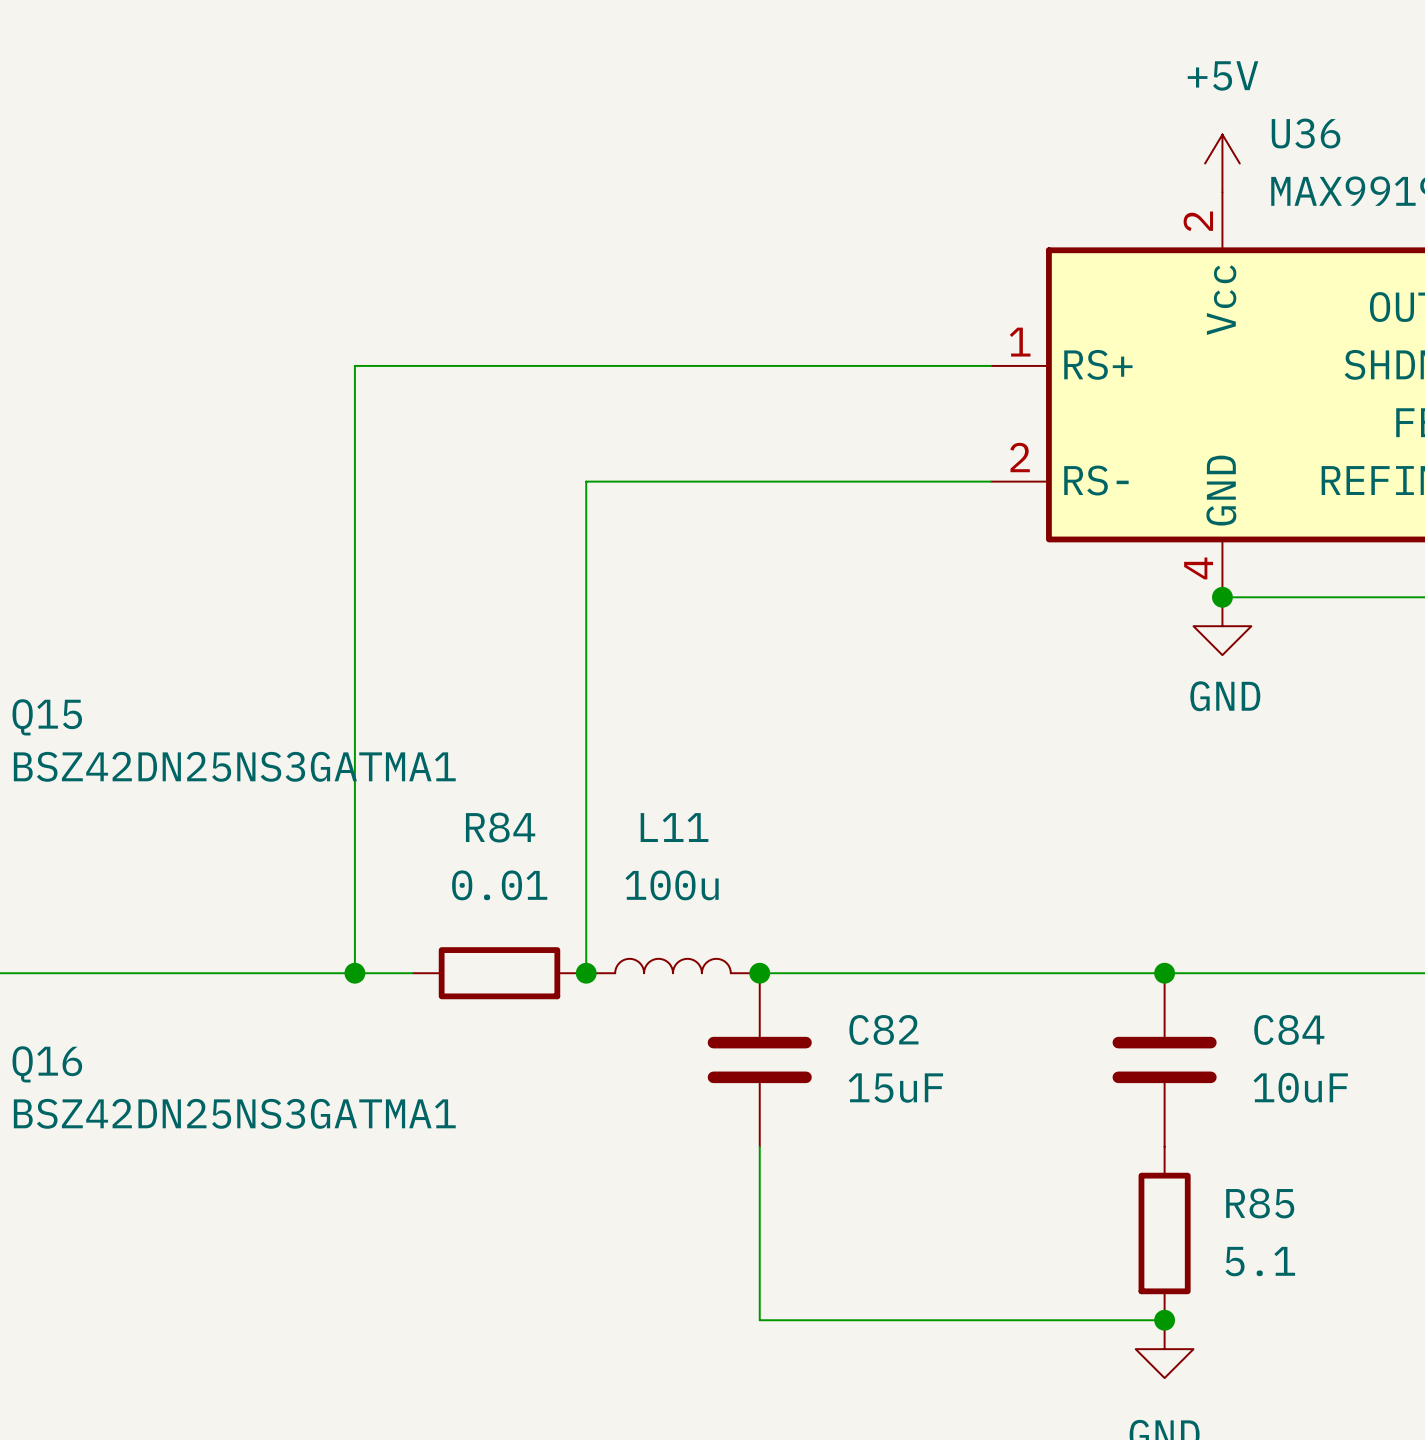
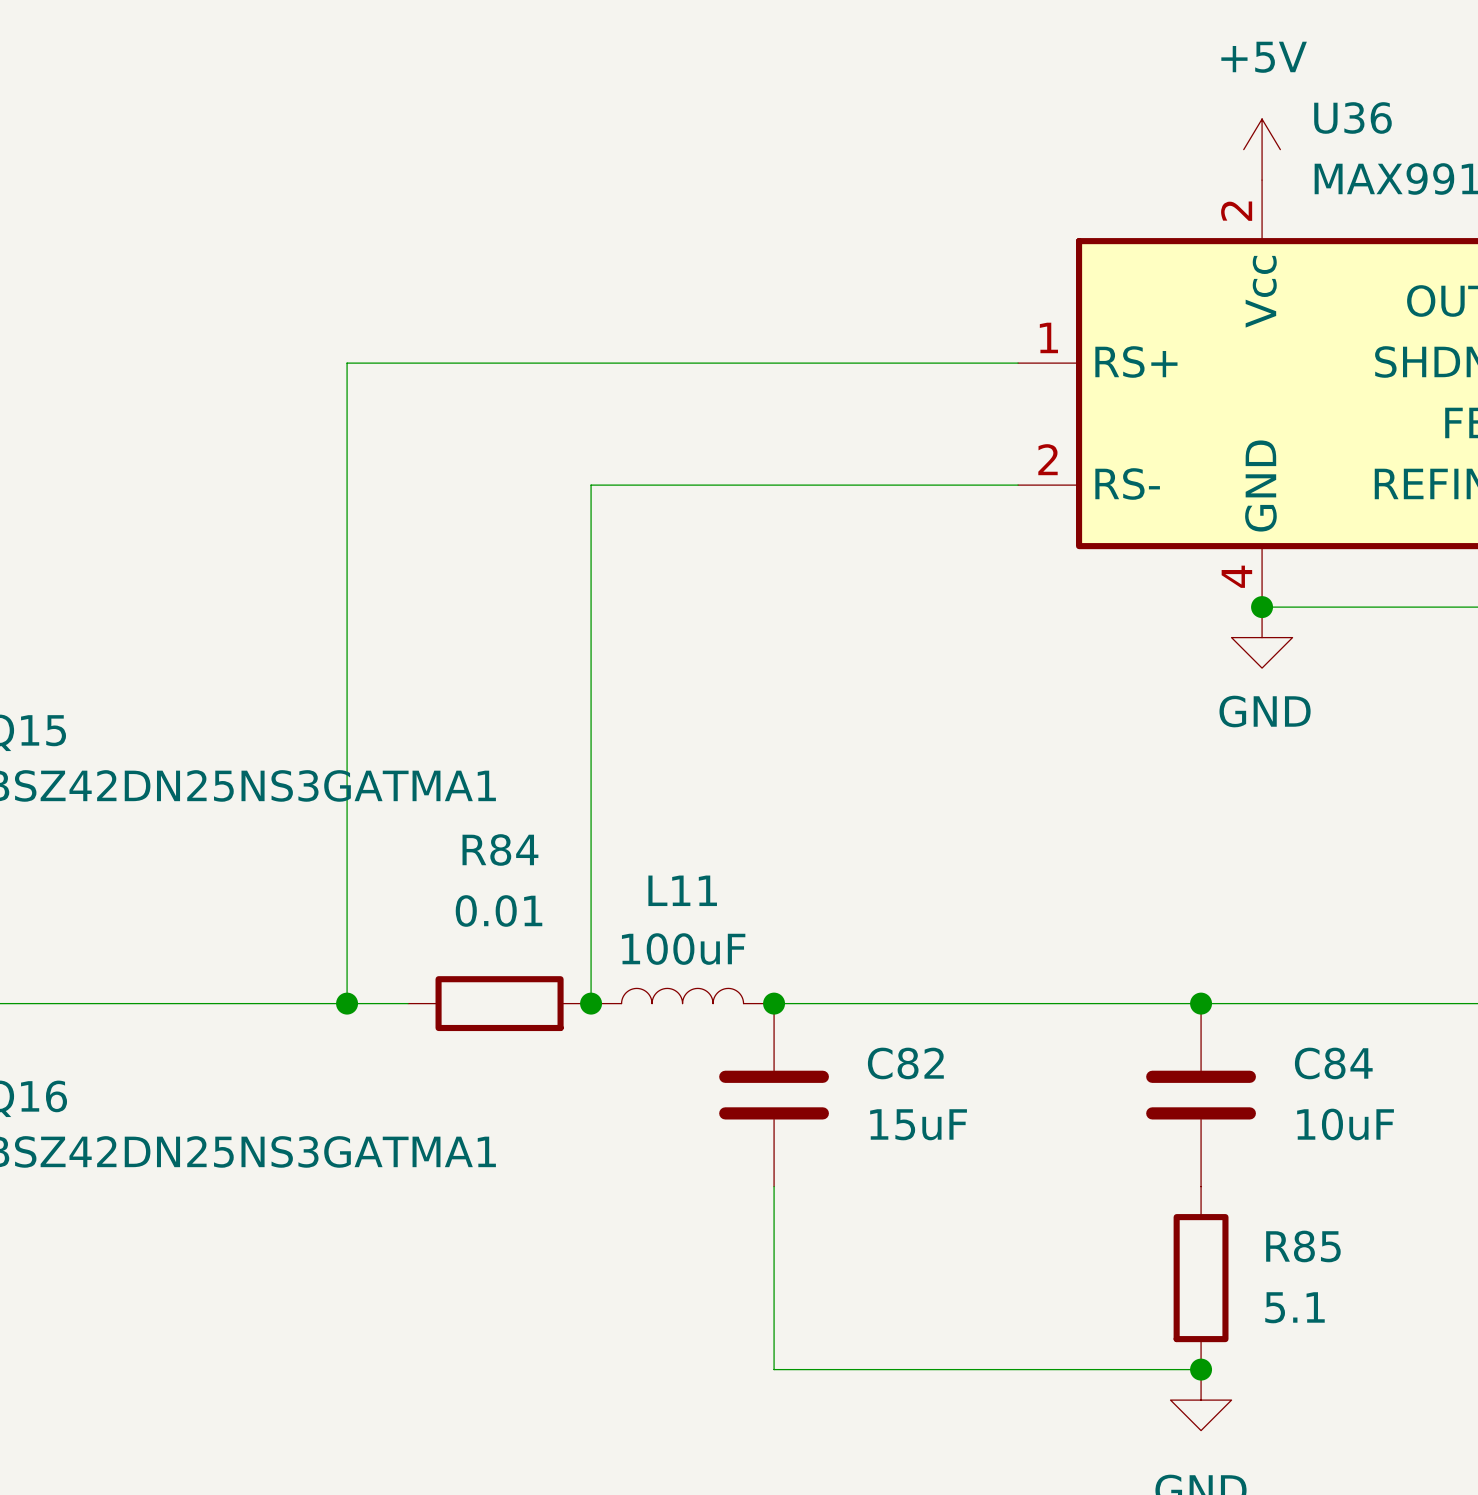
L11 name position: L11 (674, 827) -> L11 (682, 890)
L11 value: 100u (672, 885) -> 100uF (683, 949)

